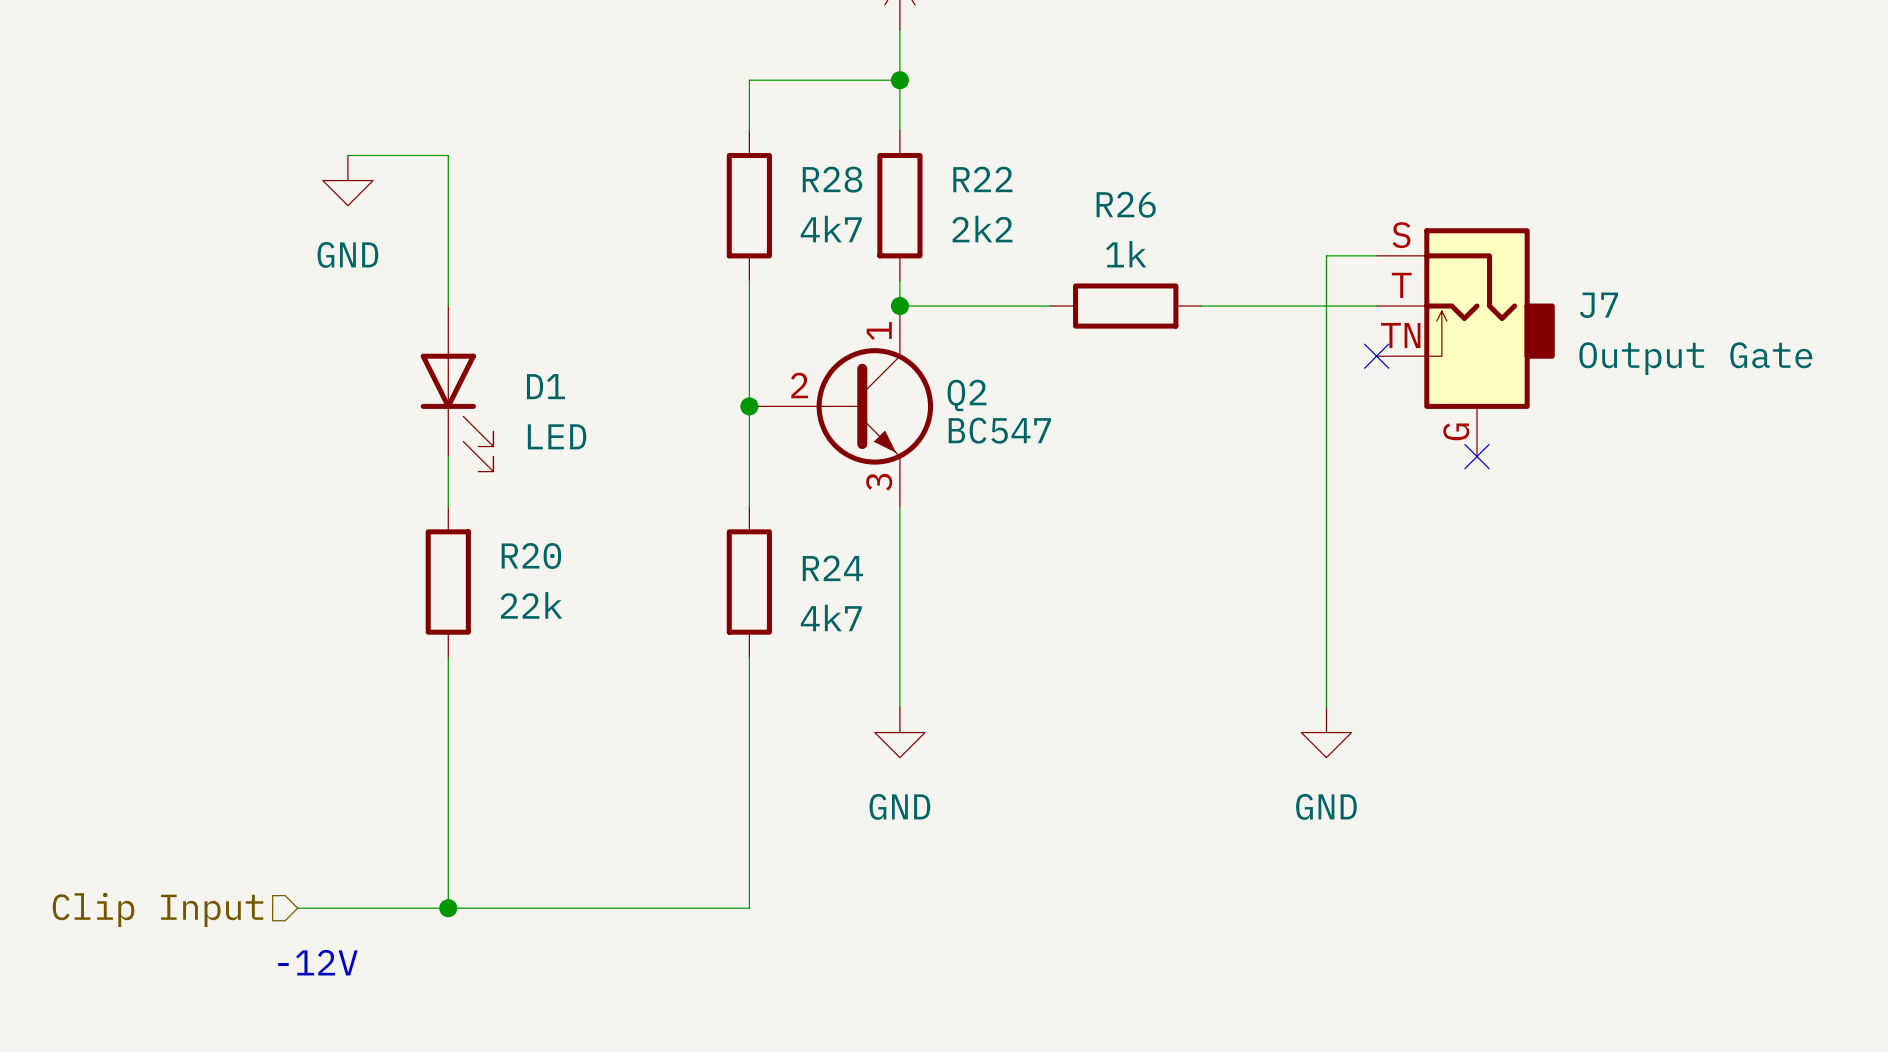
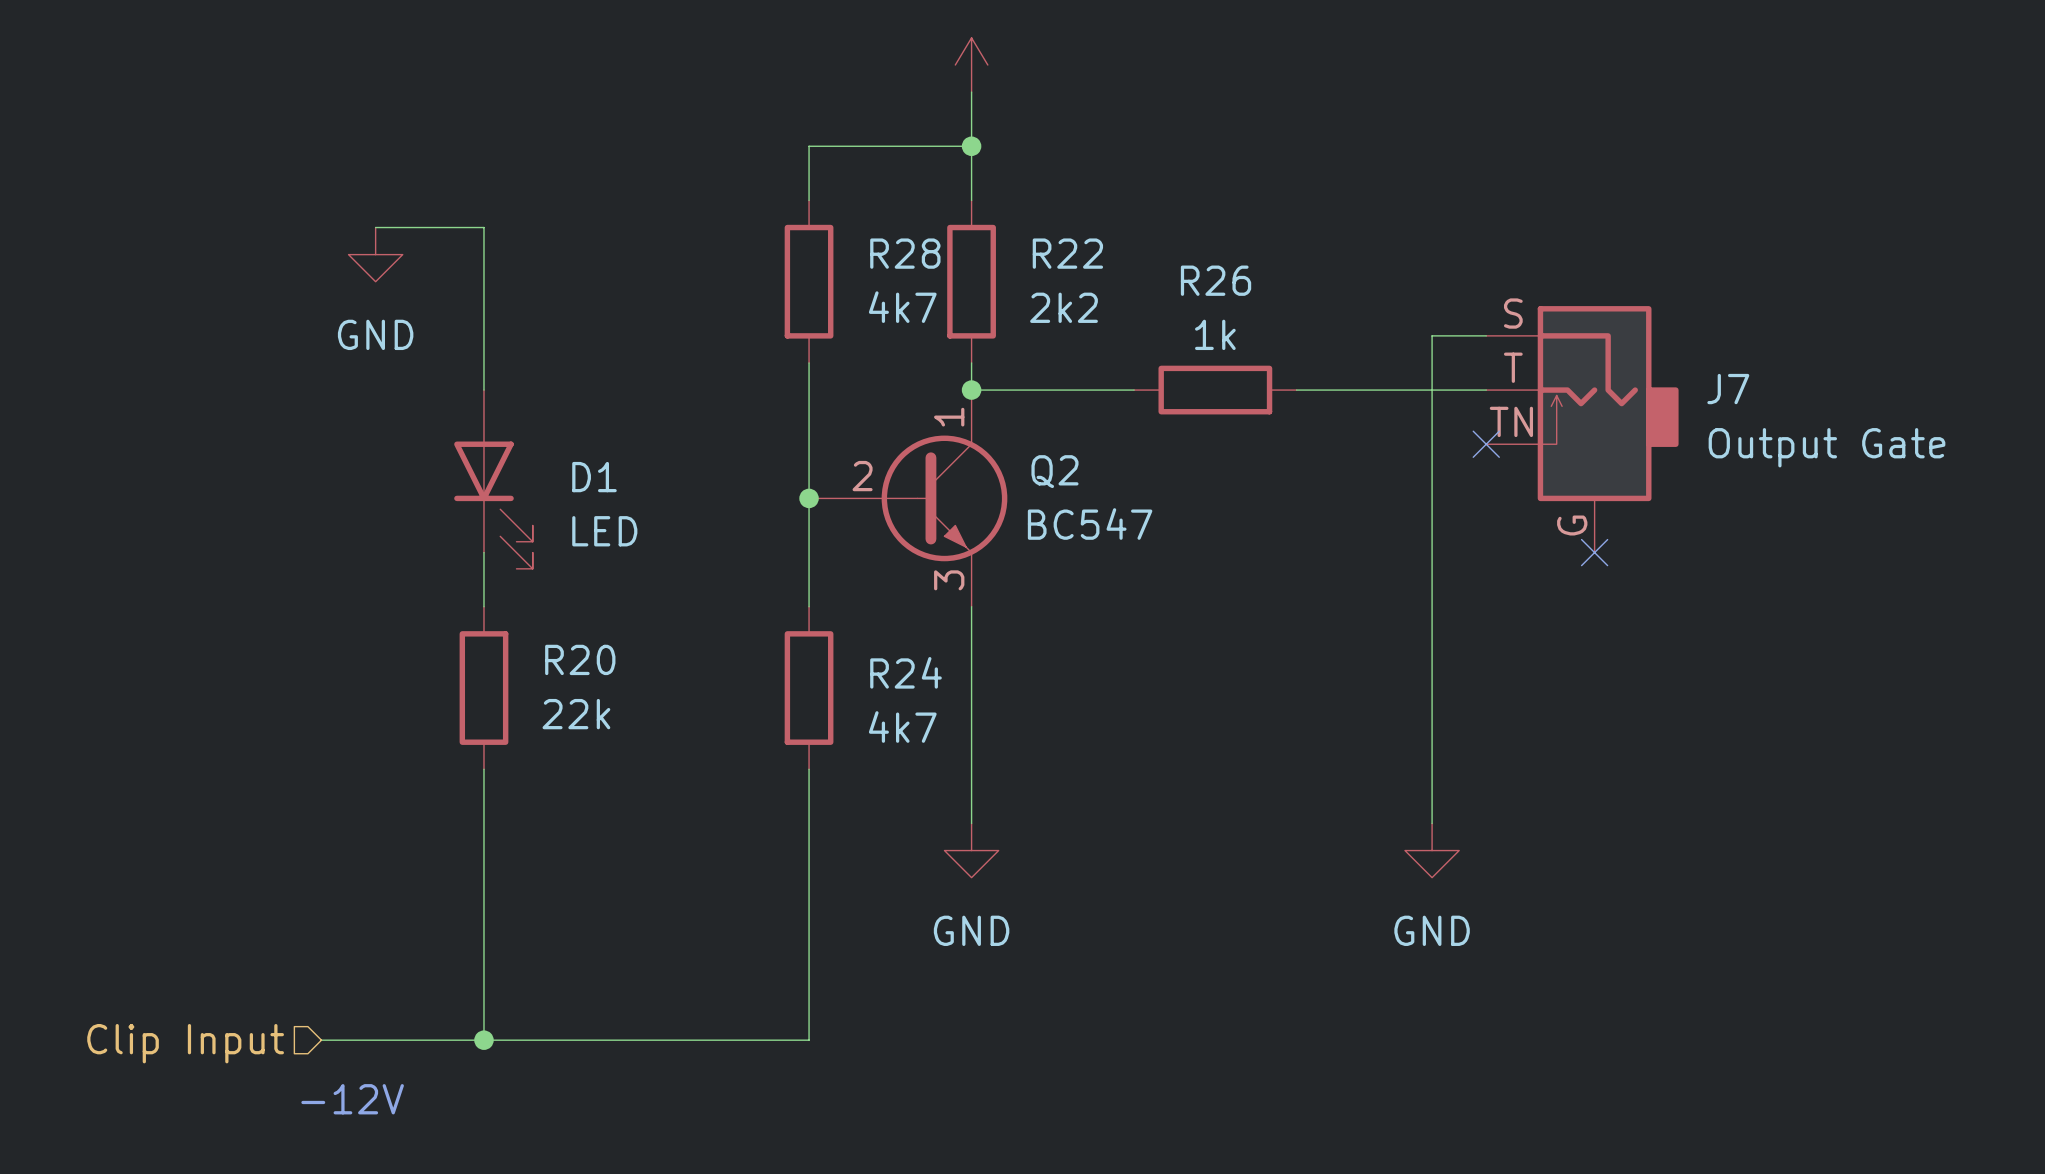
Q2 name position: Q2 (967, 395) -> Q2 (1054, 471)

